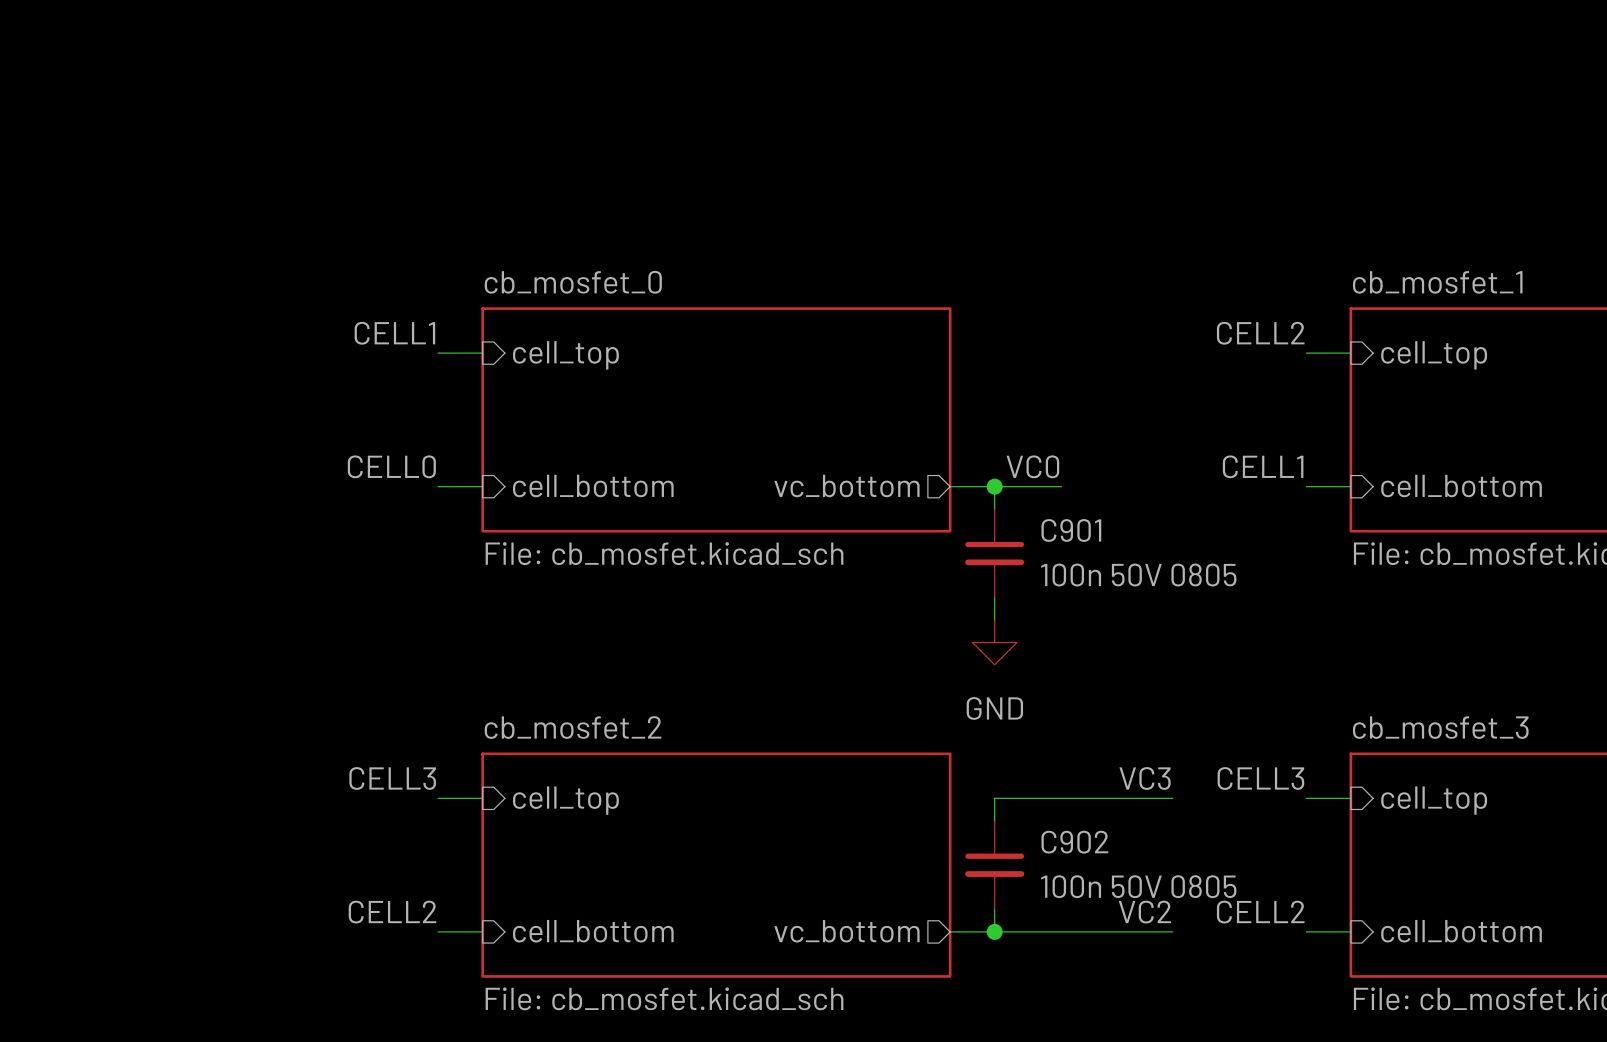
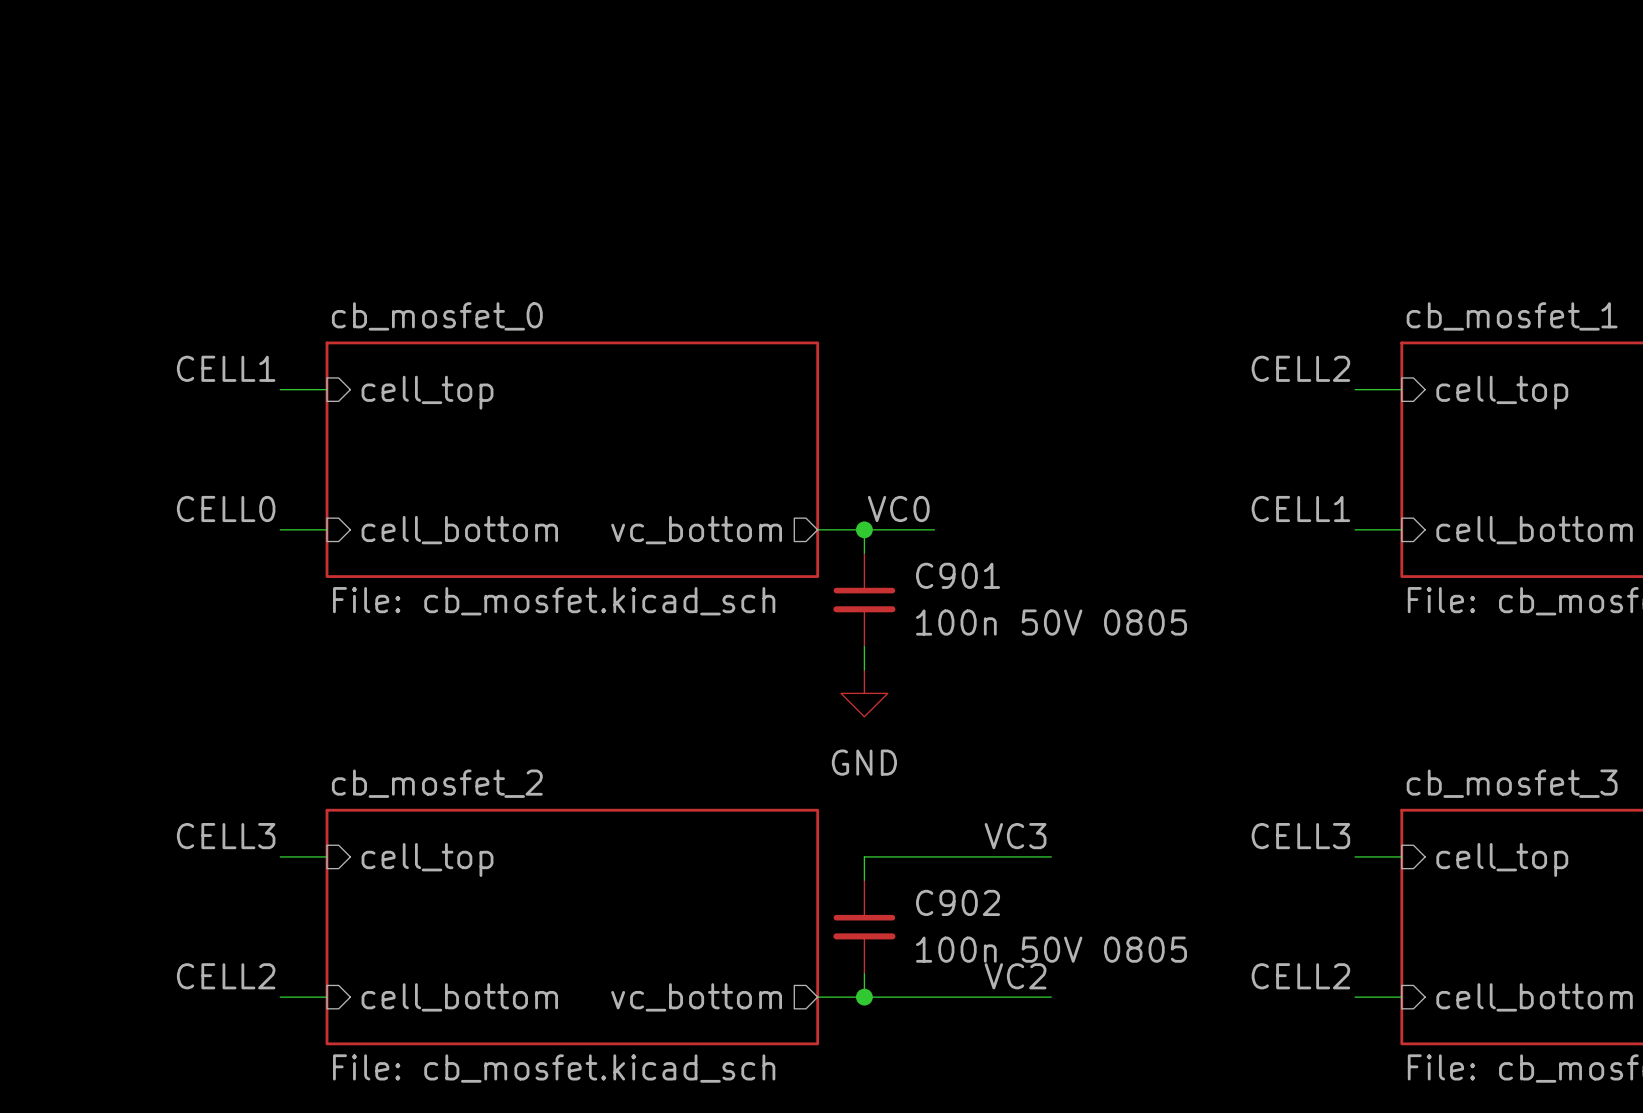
label position: CELL1 (394, 333) -> CELL1 (226, 368)
wire: (438, 353) (482, 353) -> (280, 389) (327, 389)
sheet pin position: cell_top (565, 355) -> cell_top (427, 392)
sheet cb_mosfet_0 position: (716, 419) -> (572, 459)
label position: CELL0 (391, 466) -> CELL0 (226, 508)
label position: VC0 (1032, 466) -> VC0 (898, 508)
sheet pin position: cell_bottom (593, 485) -> cell_bottom (459, 530)
sheet pin position: vc_bottom (846, 485) -> vc_bottom (696, 530)
wire: (438, 486) (482, 486) -> (280, 529) (327, 529)
junction: none -> (864, 529)
wire: (950, 486) (1061, 486) -> (817, 529) (934, 529)
wire: (994, 486) (994, 508) -> (864, 529) (864, 553)
junction: (994, 486) -> none
C901 position: (994, 553) -> (864, 599)
wire: (994, 597) (994, 620) -> (864, 646) (864, 670)
power symbol position: GND (994, 642) -> GND (864, 693)
label position: CELL3 (392, 778) -> CELL3 (226, 836)
label position: VC3 (1145, 778) -> VC3 (1015, 836)
wire: (438, 798) (482, 798) -> (280, 856) (327, 856)
wire: (994, 798) (994, 820) -> (1027, 856) (864, 856) (864, 880)
wire: (1016, 798) (1172, 798) -> none
sheet pin position: cell_top (565, 800) -> cell_top (427, 859)
sheet cb_mosfet_2 position: (716, 865) -> (572, 927)
C902 position: (994, 865) -> (864, 927)
wire: (994, 909) (994, 931) -> (864, 973) (864, 997)
label position: CELL2 (392, 912) -> CELL2 (226, 976)
label position: VC2 (1144, 912) -> VC2 (1015, 976)
wire: (438, 931) (482, 931) -> (280, 997) (327, 997)
sheet pin position: cell_bottom (593, 931) -> cell_bottom (459, 997)
junction: none -> (864, 997)
sheet pin position: vc_bottom (846, 931) -> vc_bottom (696, 997)
junction: (994, 931) -> none
wire: (1016, 931) (1172, 931) -> (817, 997) (981, 997)

